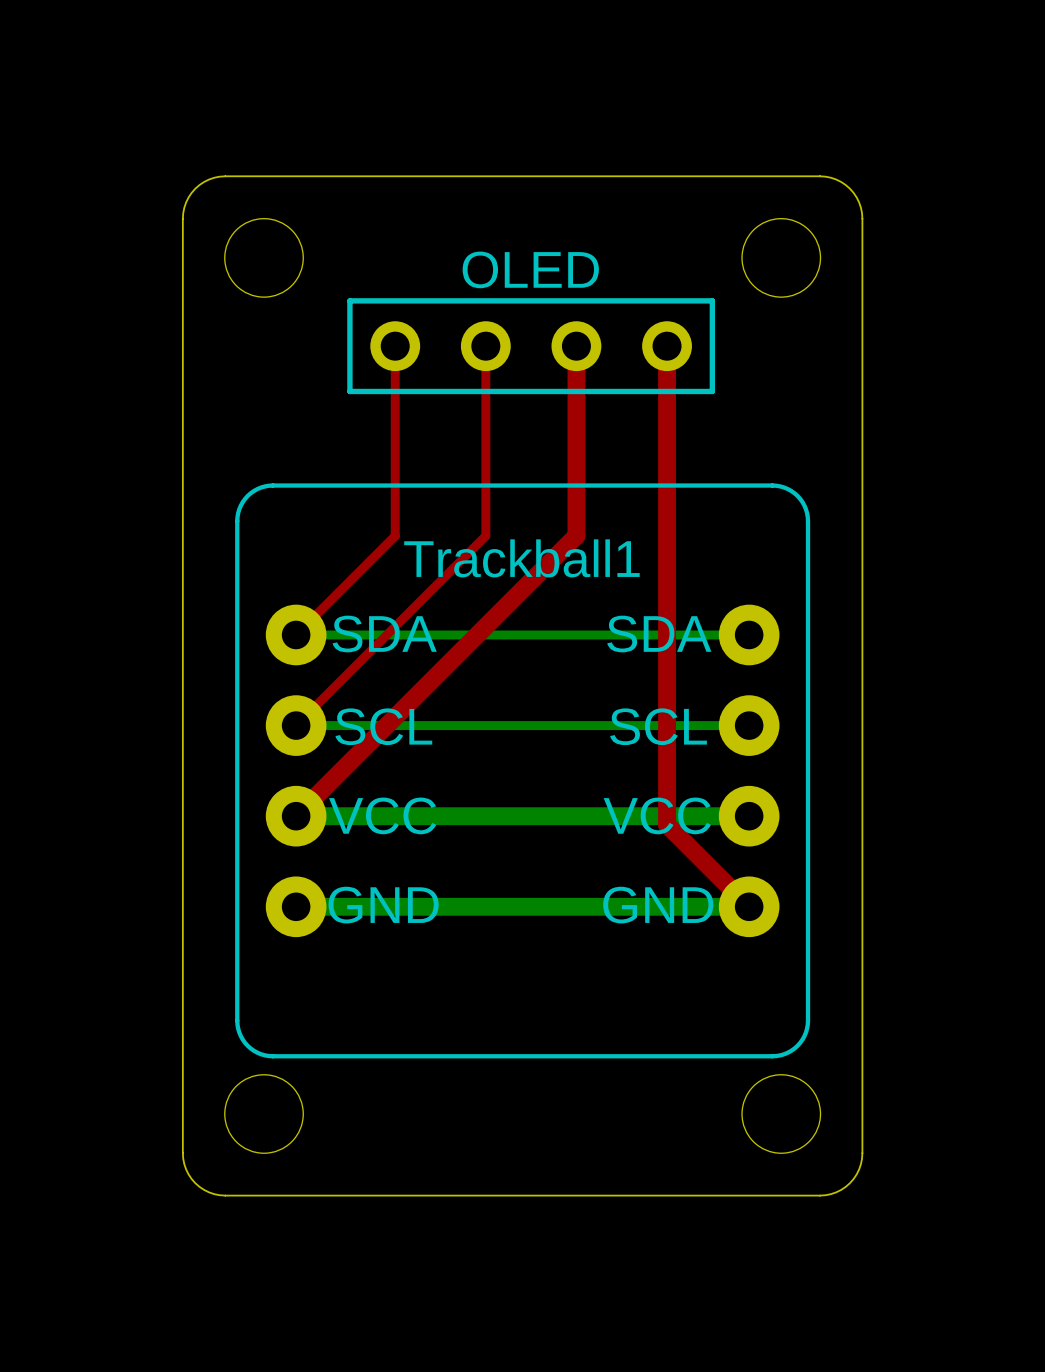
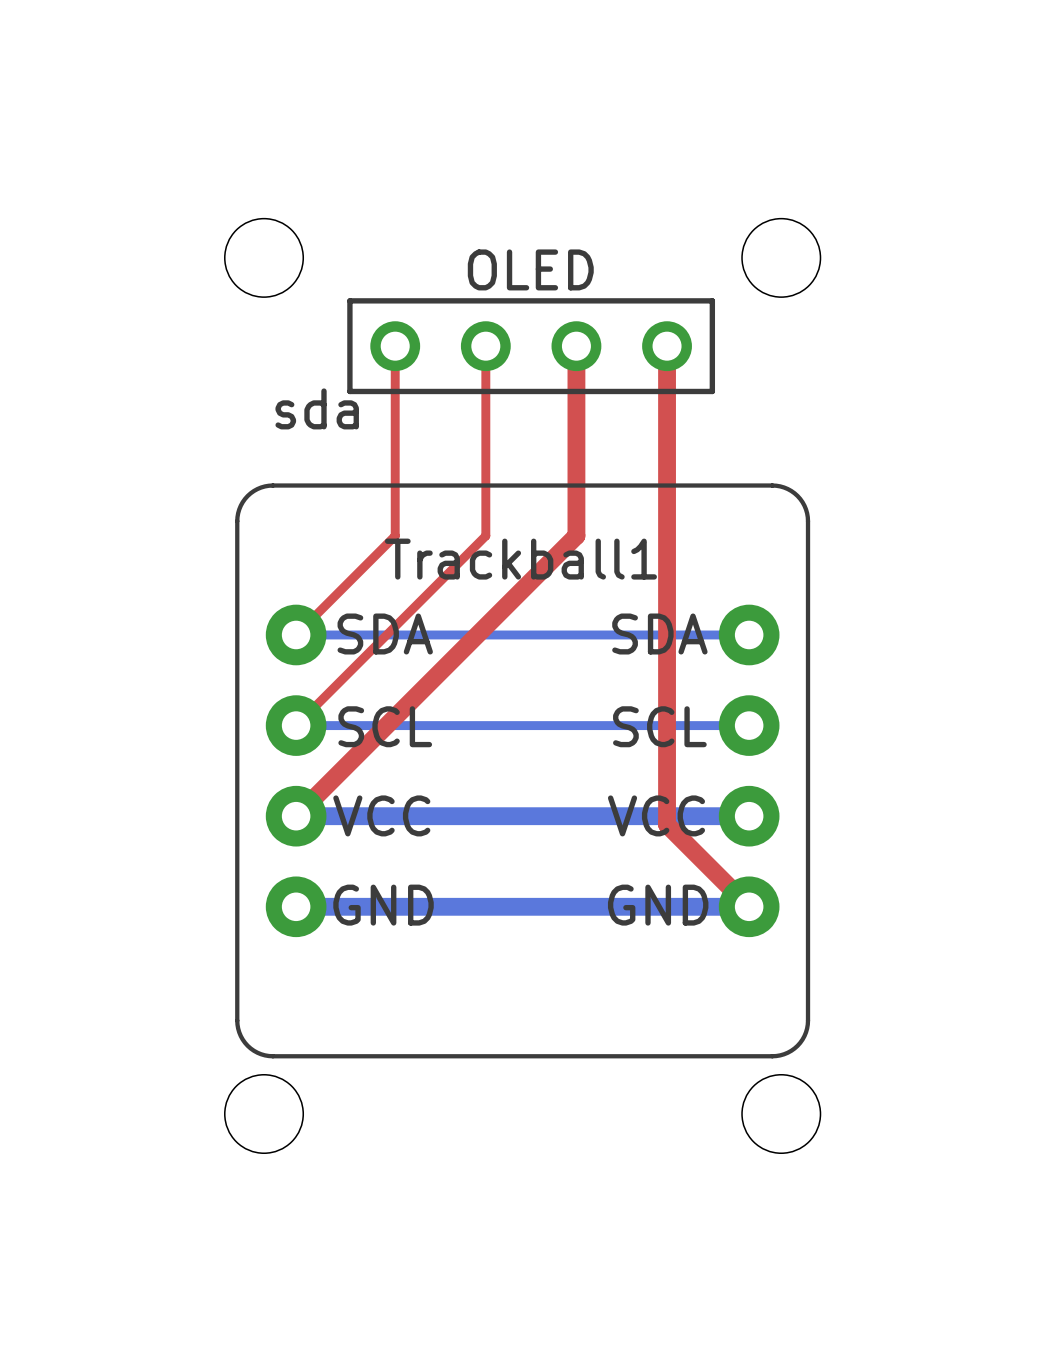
board edge: (225, 176) (819, 176) (841, 181) (856, 197) (862, 218) (862, 1153) (856, 1174) (841, 1189) (819, 1195) (225, 1195) (204, 1189) (188, 1174) (182, 1153) (182, 218) (186, 202) (195, 188) (209, 179) (225, 176) -> none
text: none -> sda (317, 408)

